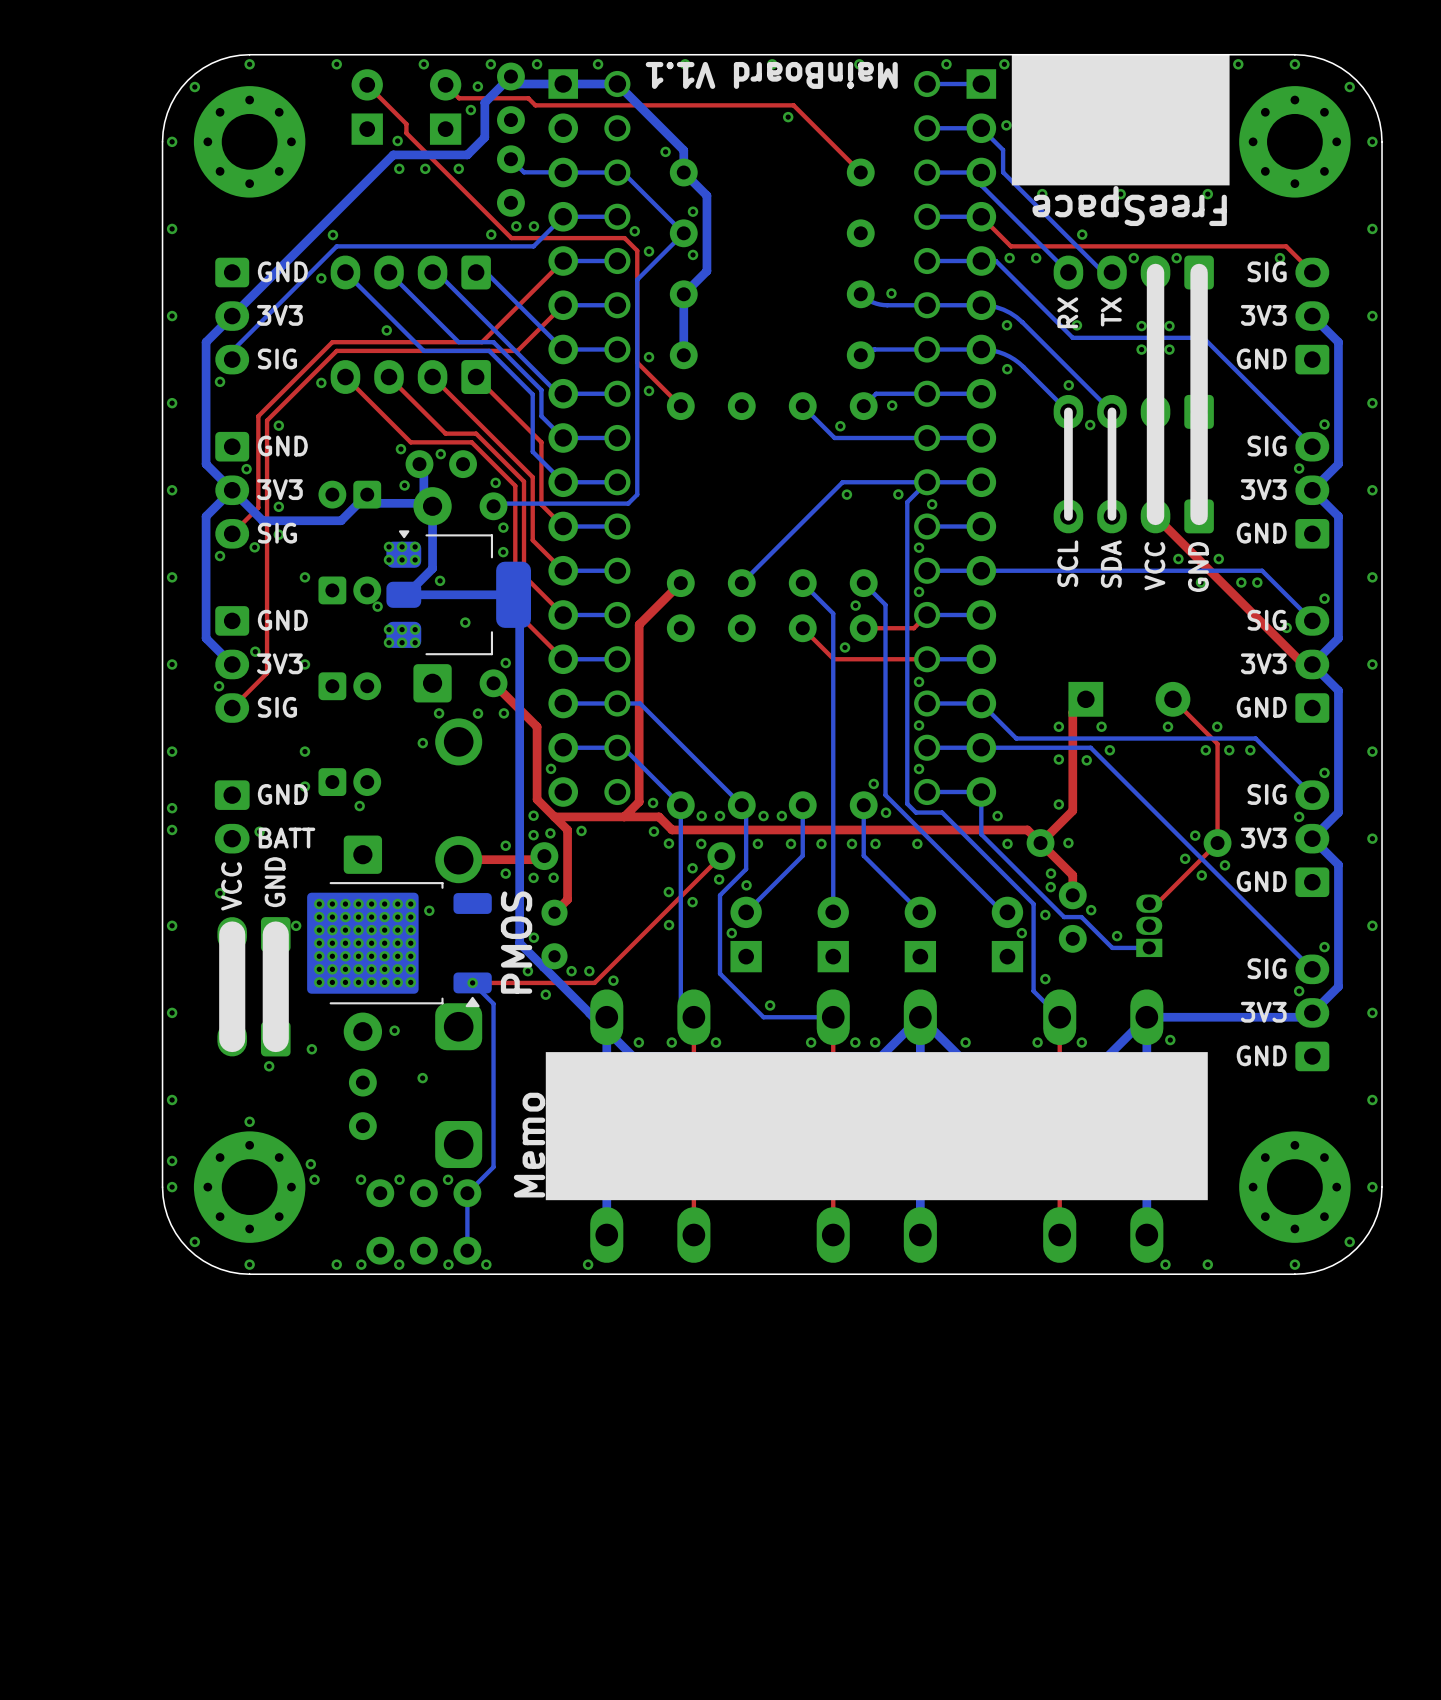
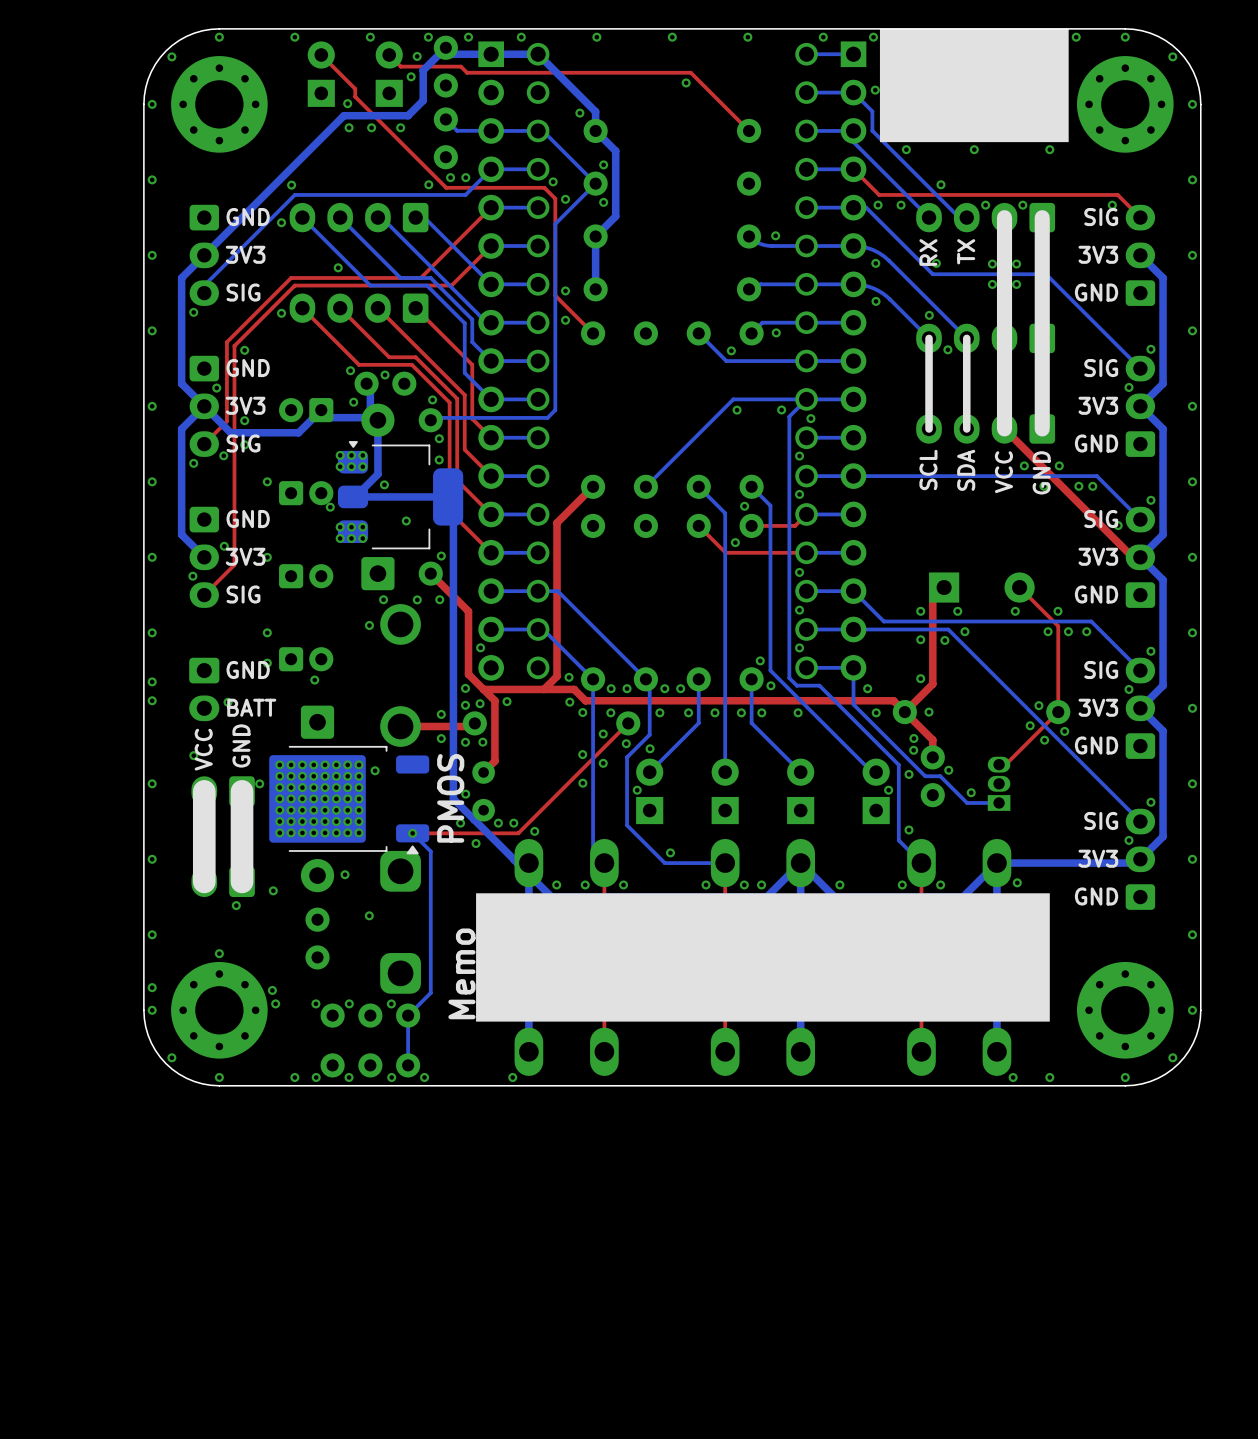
text: MainBoard V1.1 (771, 75) -> none
text: FreeSpace (1129, 206) -> none

